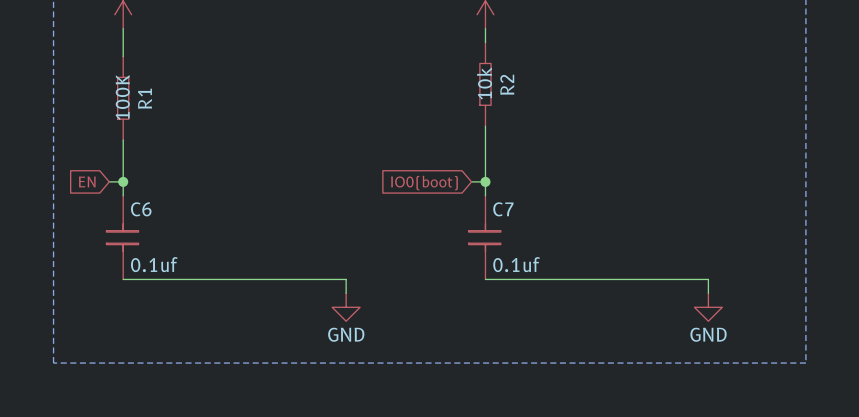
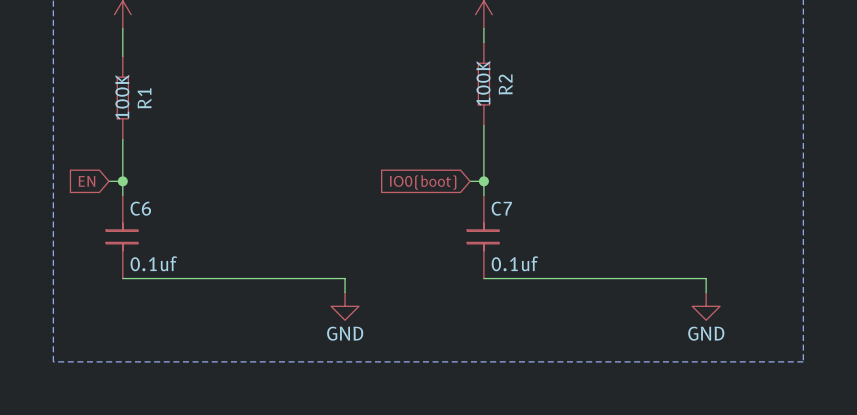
R2 value: 10k (484, 83) -> 100K (483, 83)

